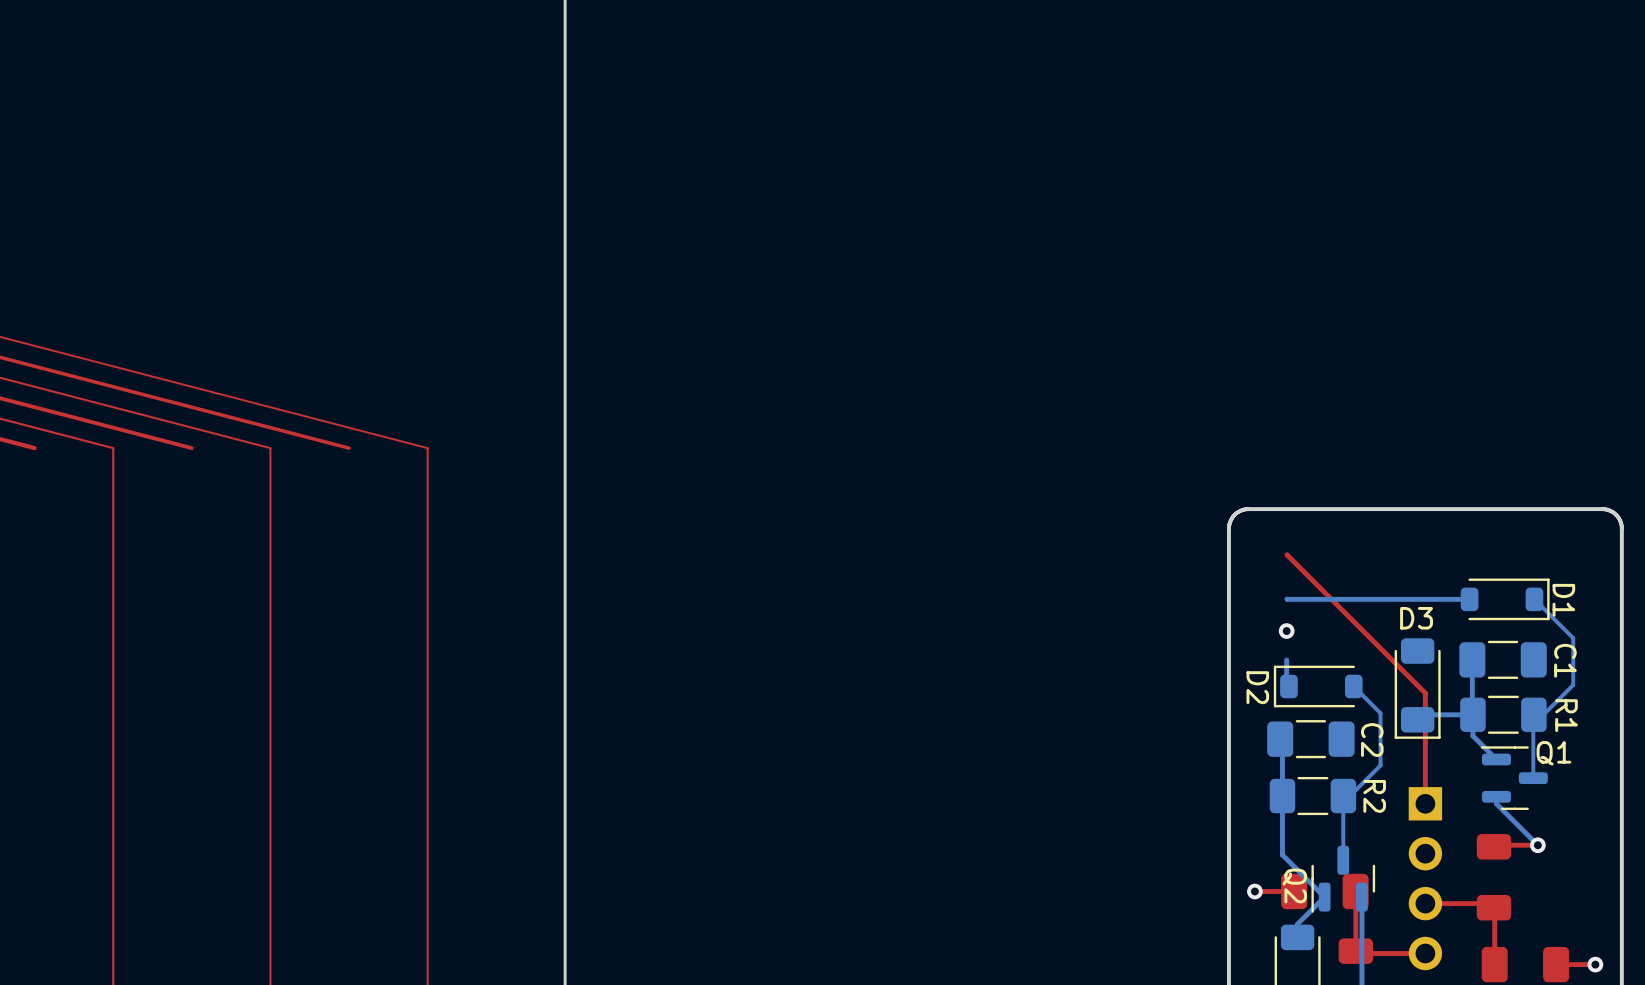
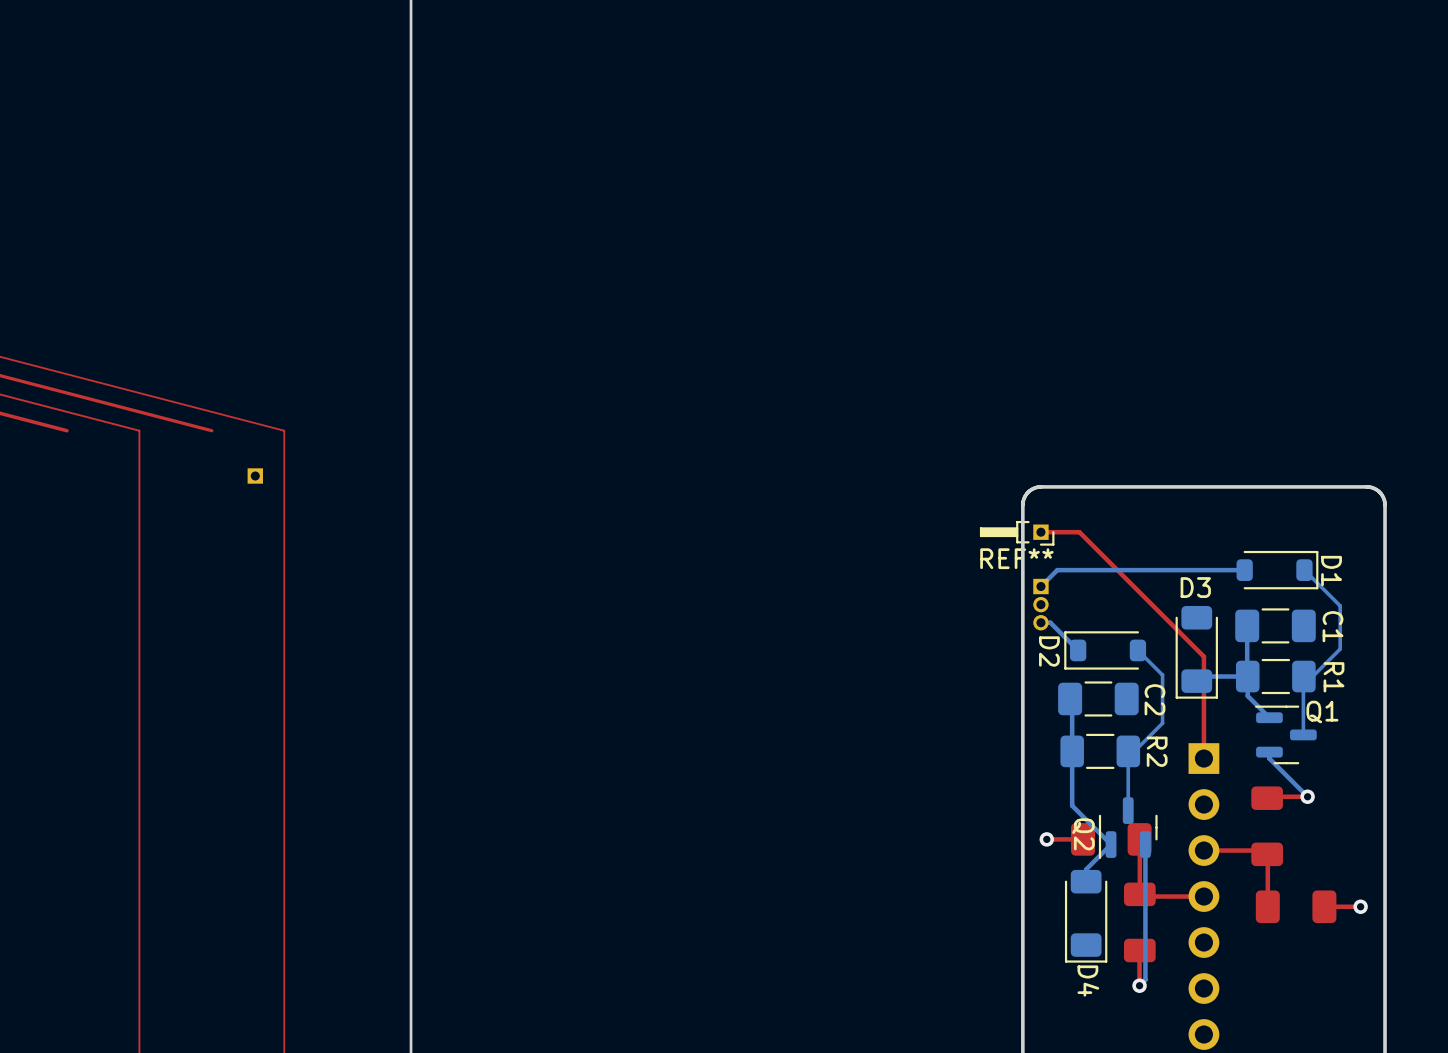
part: none -> (255, 476)
top track: (1286, 554) (1290, 558) -> (1040, 532) (1079, 532)
REF**: none -> (1017, 533)
bottom track: none -> (1076, 570) (1057, 570) (1040, 586)
via: (1286, 631) -> none
part: none -> (1040, 604)
bottom track: (1286, 660) (1286, 684) -> (1040, 622) (1050, 622) (1075, 647)

